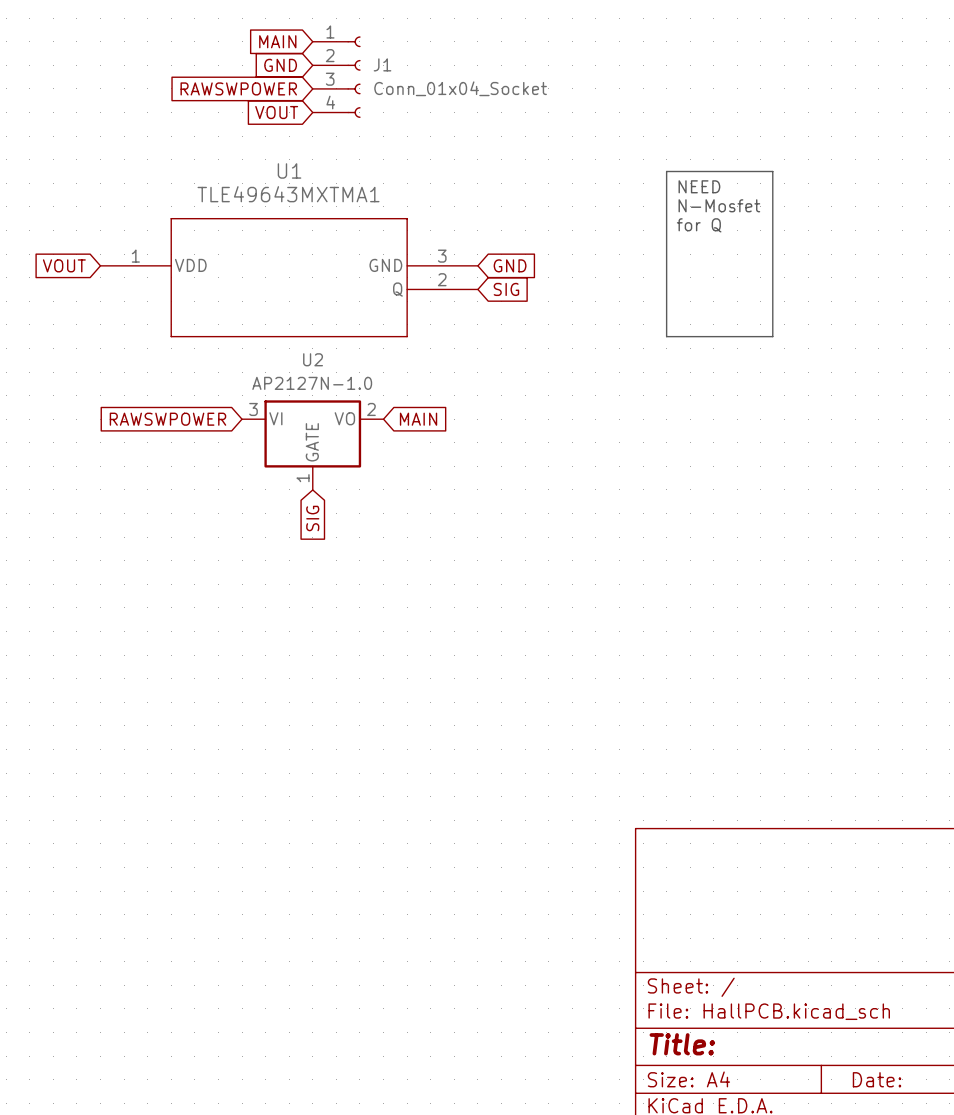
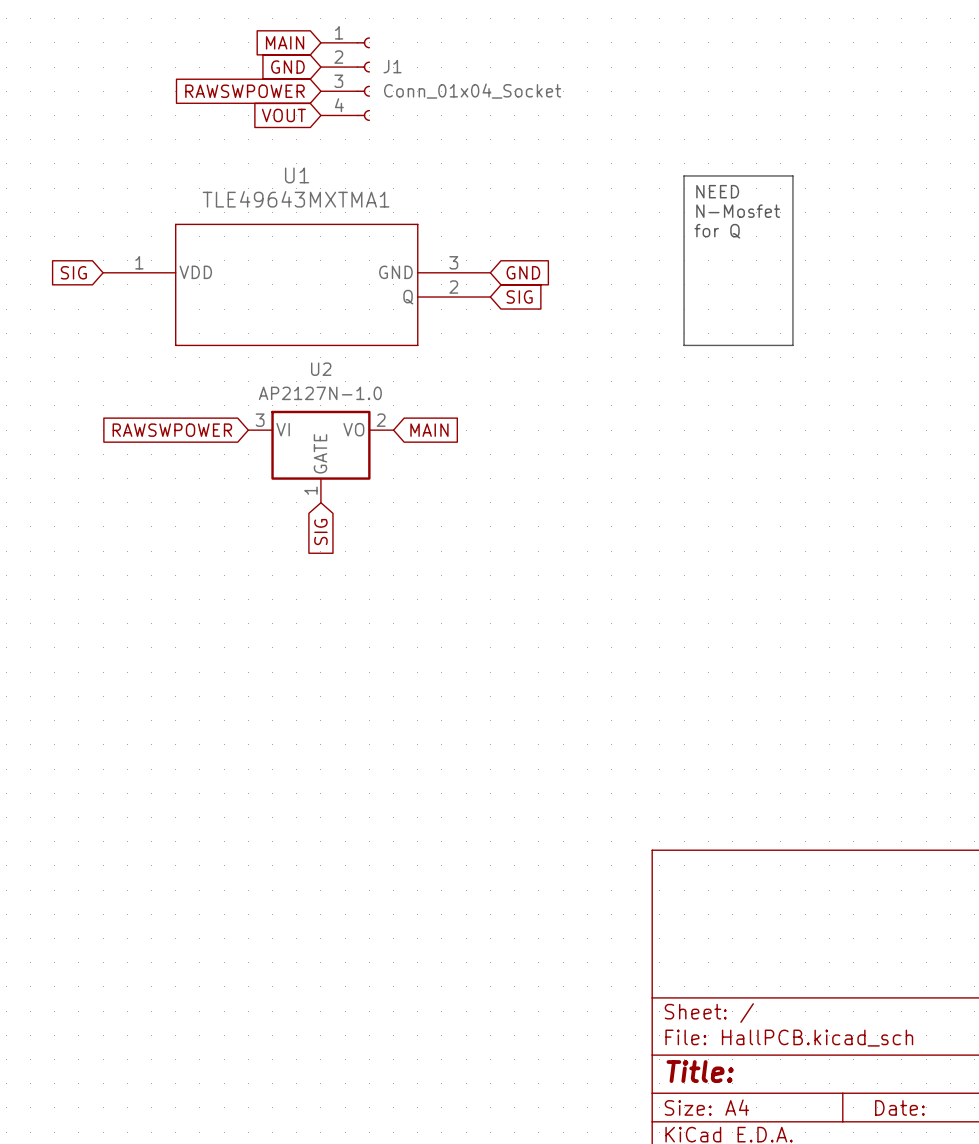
global label: VOUT (64, 265) -> SIG (73, 272)

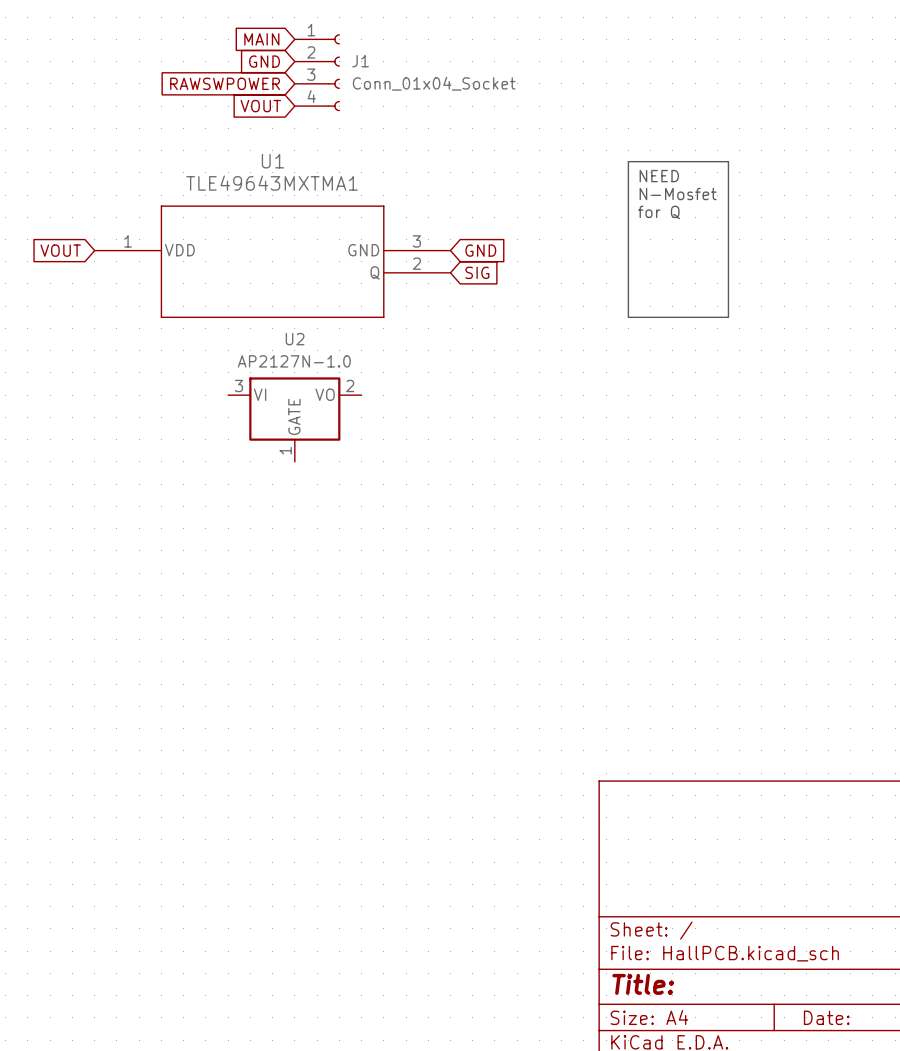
global label: SIG (73, 272) -> VOUT (60, 250)
global label: RAWSWPOWER (172, 430) -> none
global label: MAIN (429, 430) -> none
global label: SIG (320, 532) -> none

